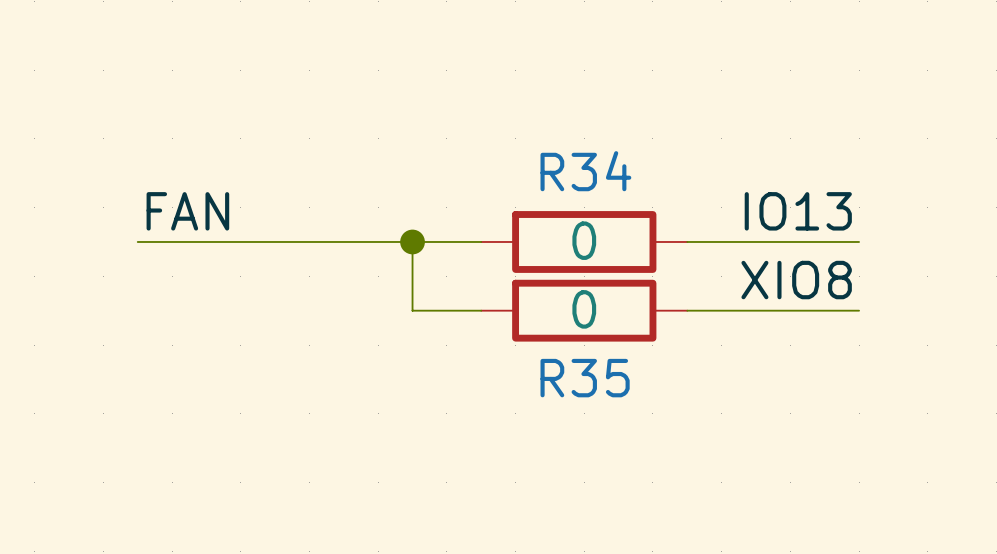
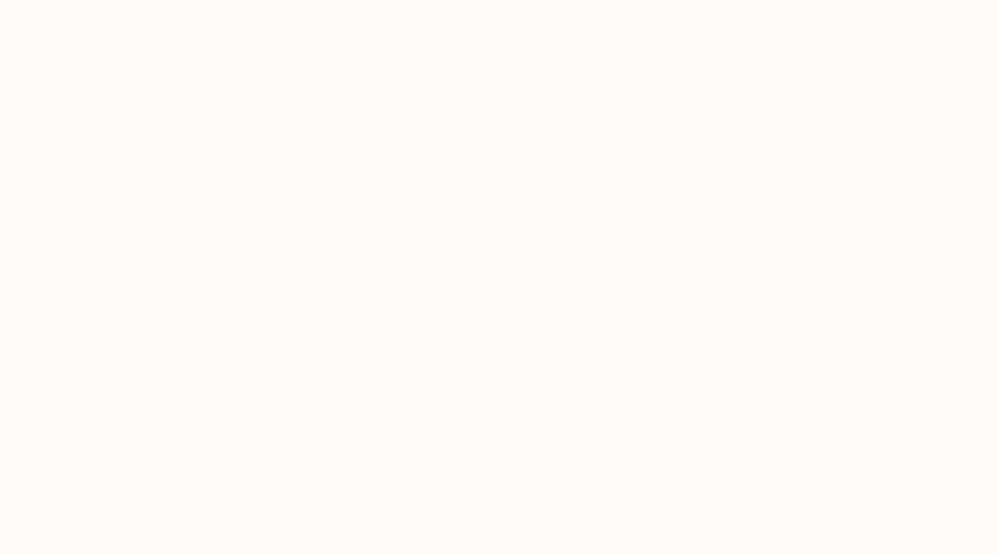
label: FAN (187, 211) -> none
label: IO13 (798, 211) -> none
wire: (137, 241) (481, 241) -> none
wire: (412, 241) (412, 310) (481, 310) -> none
junction: (412, 241) -> none
R34: 0 (584, 241) -> none
wire: (687, 241) (859, 241) -> none
label: XIO8 (796, 280) -> none
R35: 0 (584, 310) -> none
wire: (687, 310) (859, 310) -> none

